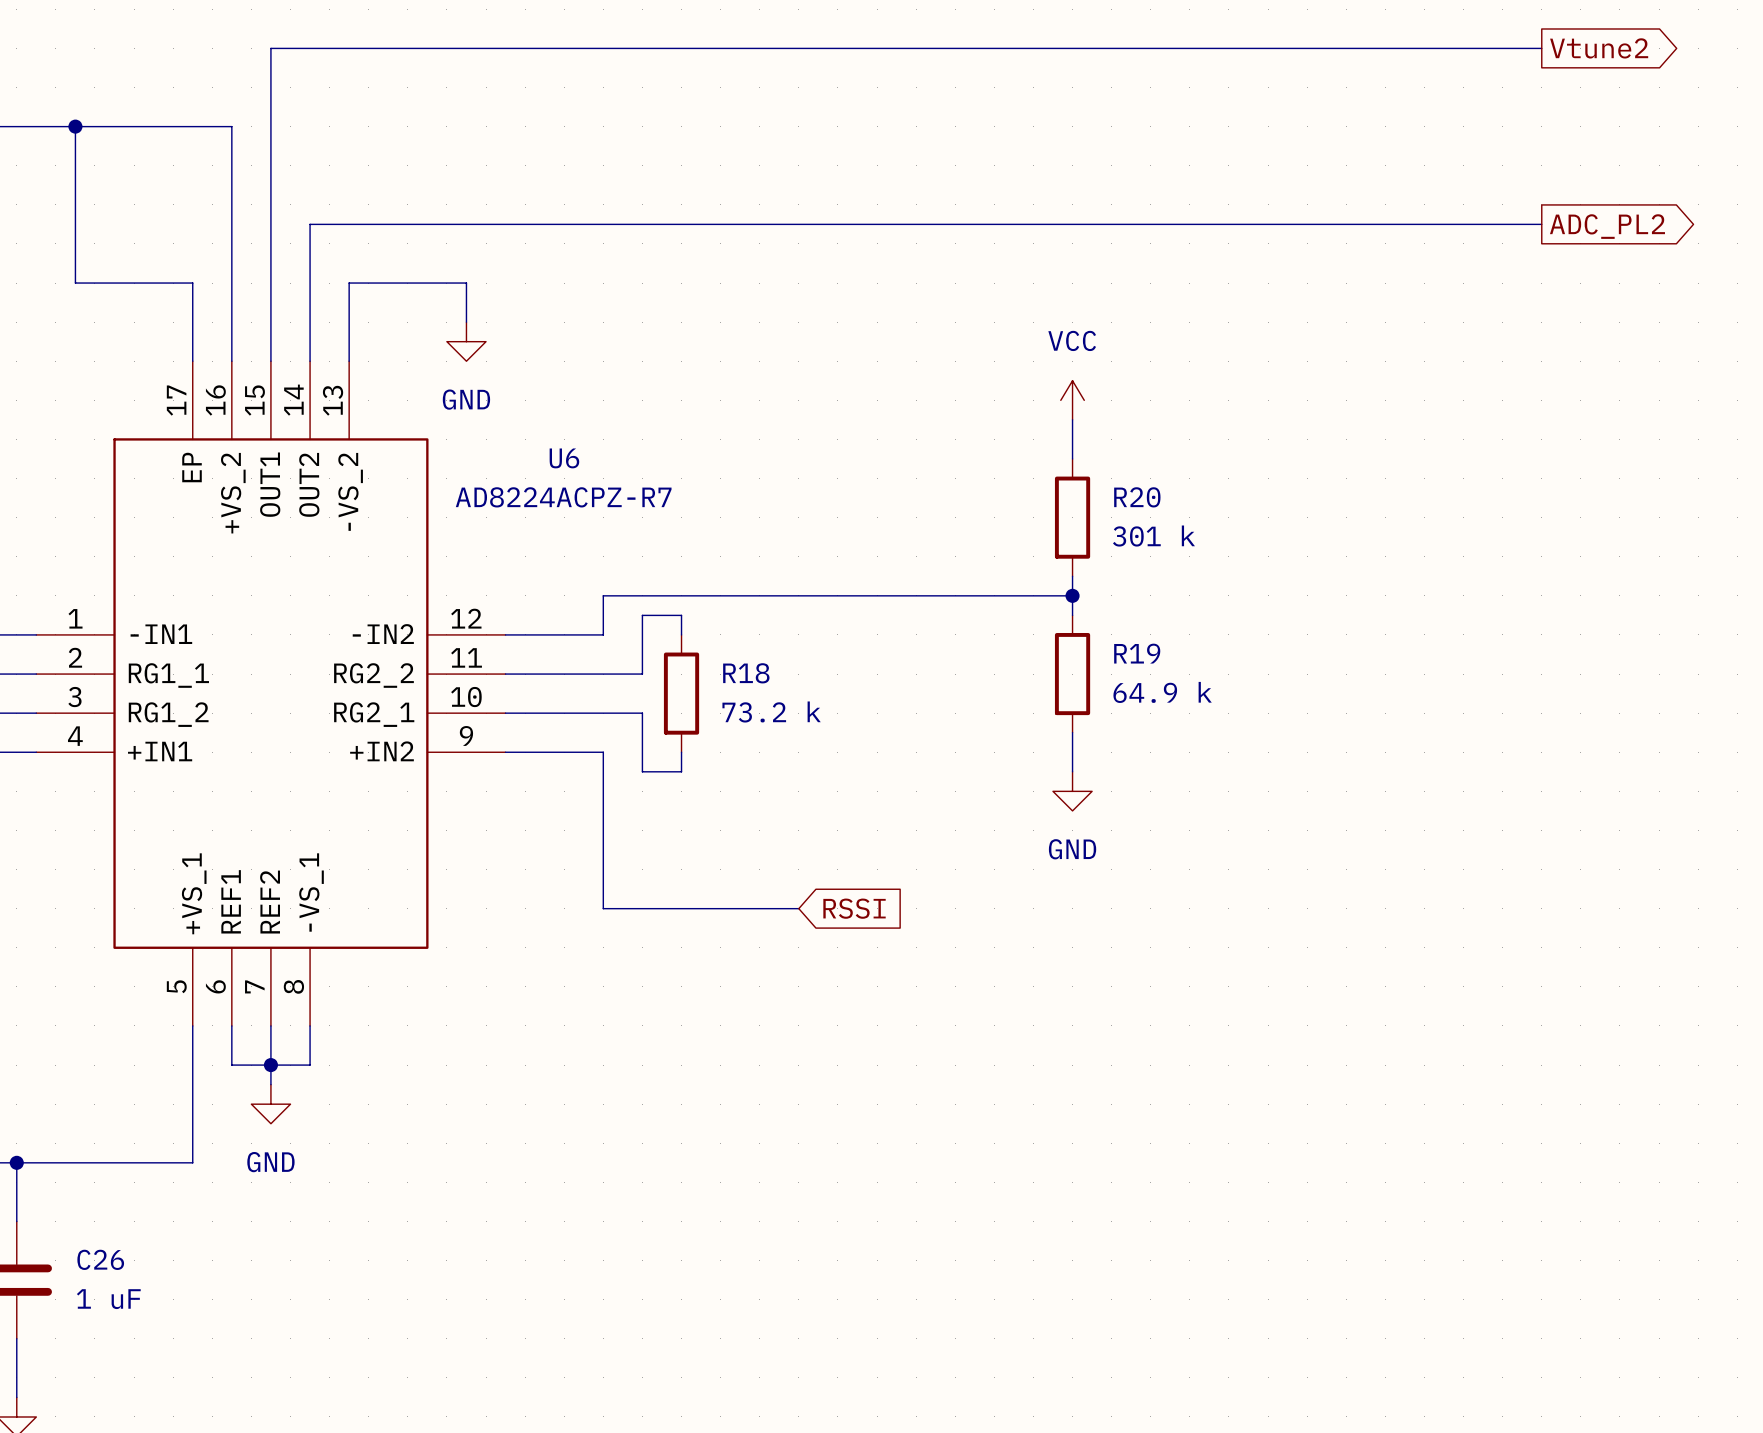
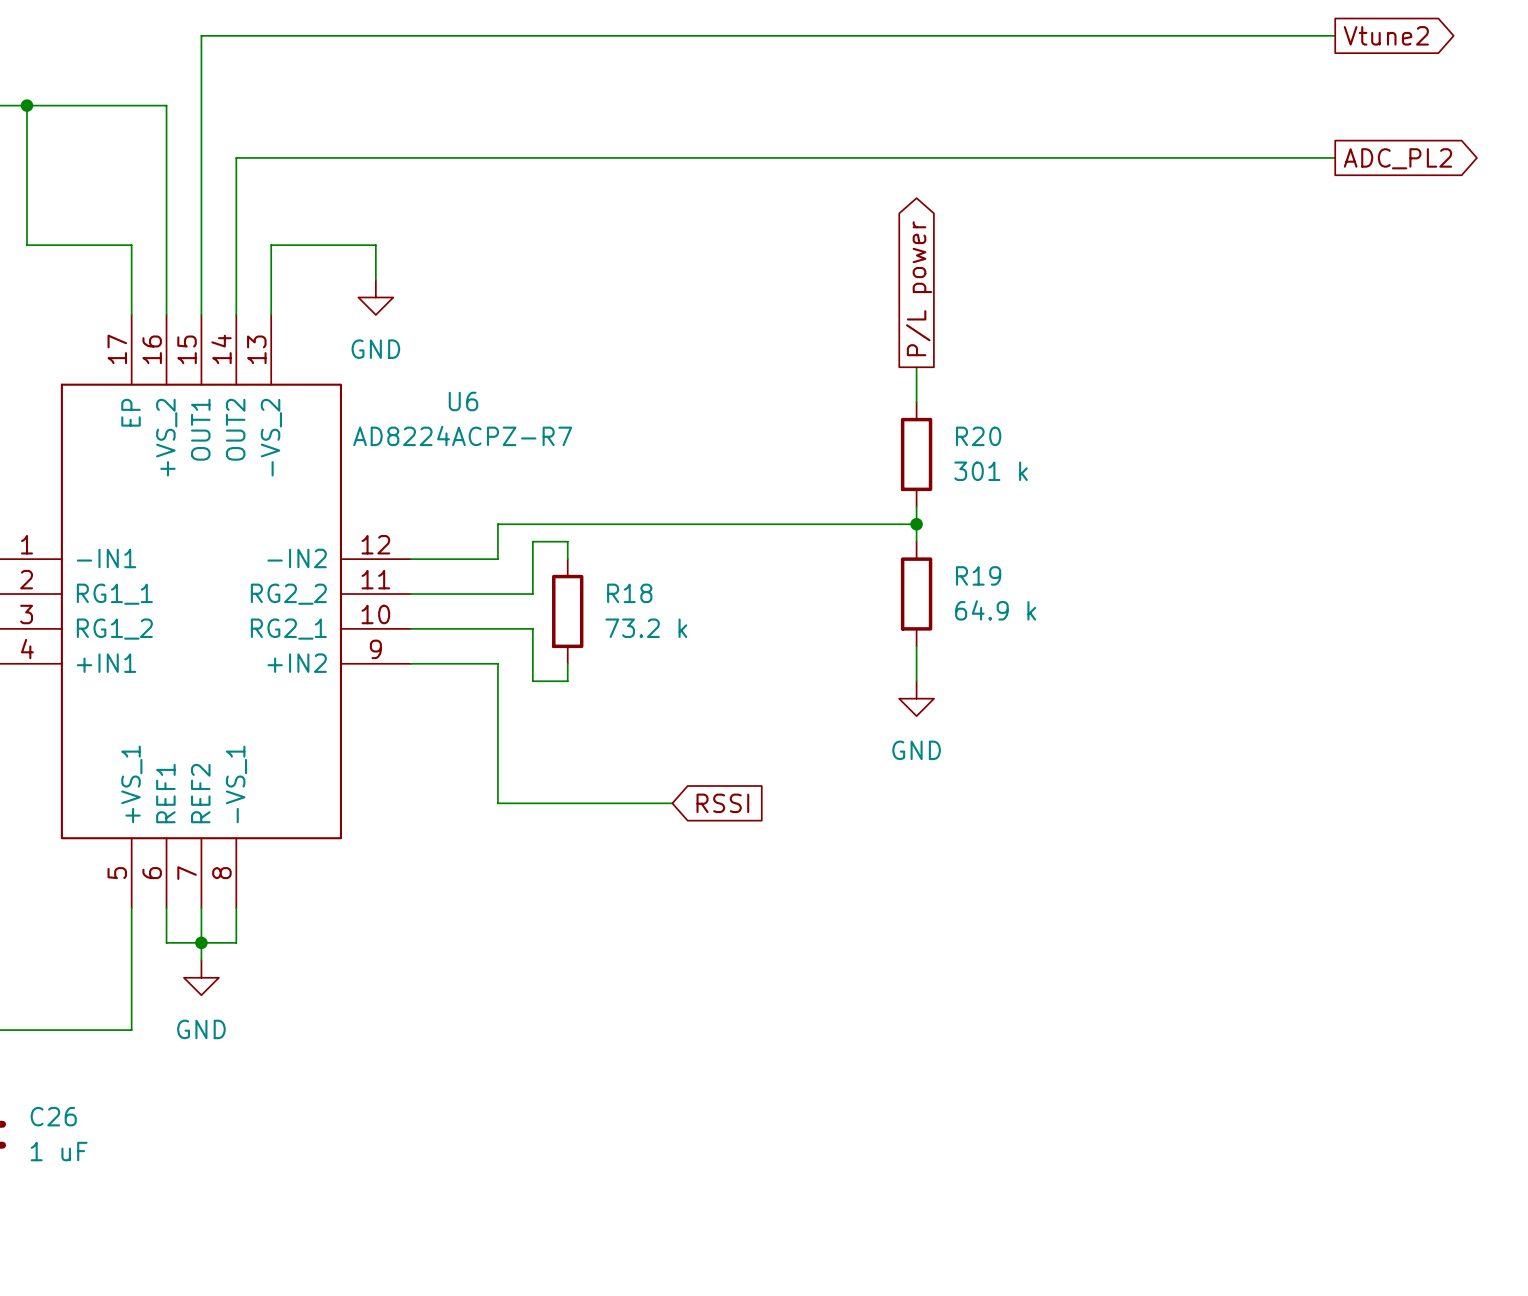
wire: (310, 224) (1541, 224) -> (236, 192) (236, 157) (1335, 157)
global label position: ADC_PL2 (1607, 226) -> ADC_PL2 (1397, 158)
global label: none -> P/L power (919, 288)
power symbol: VCC (1072, 400) -> none

